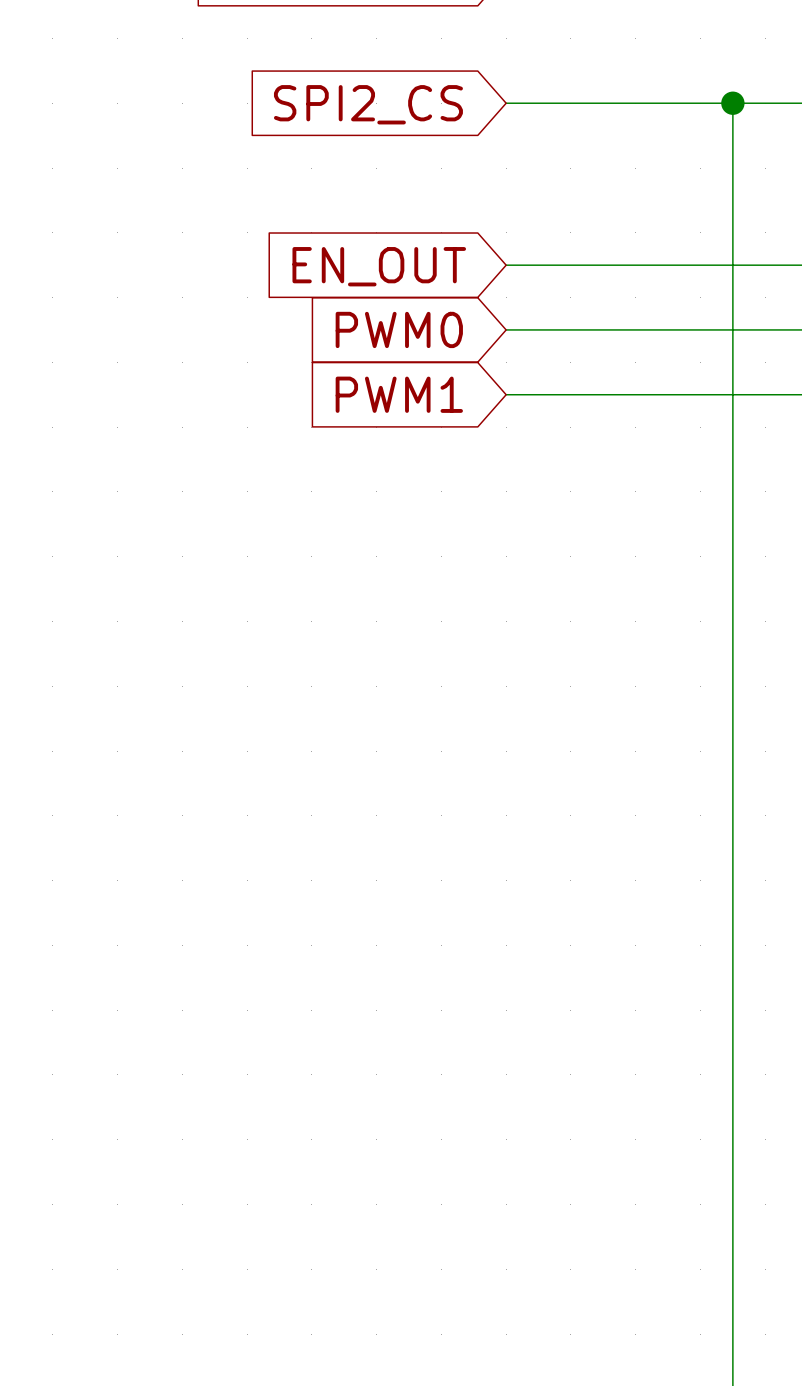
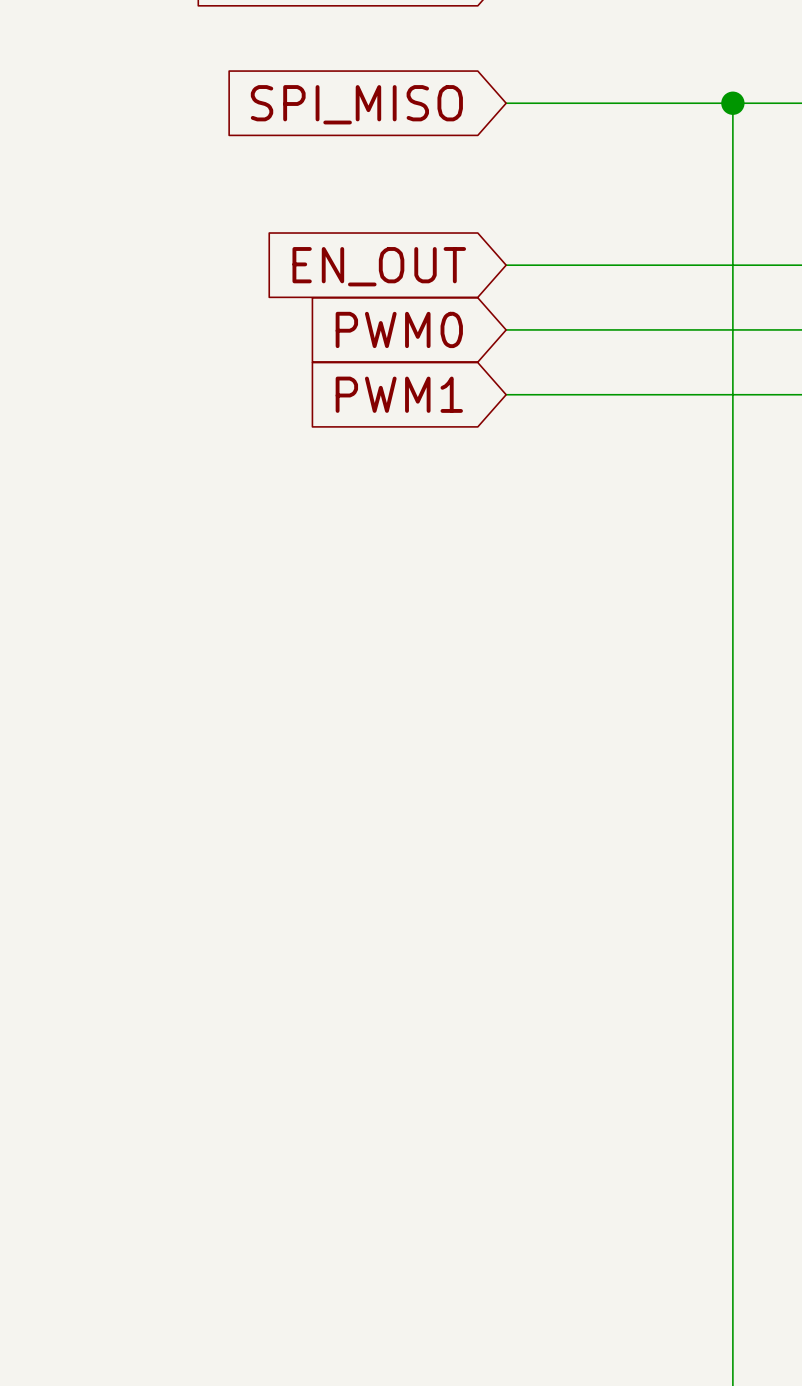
global label: SPI2_CS (368, 104) -> SPI_MISO (356, 104)

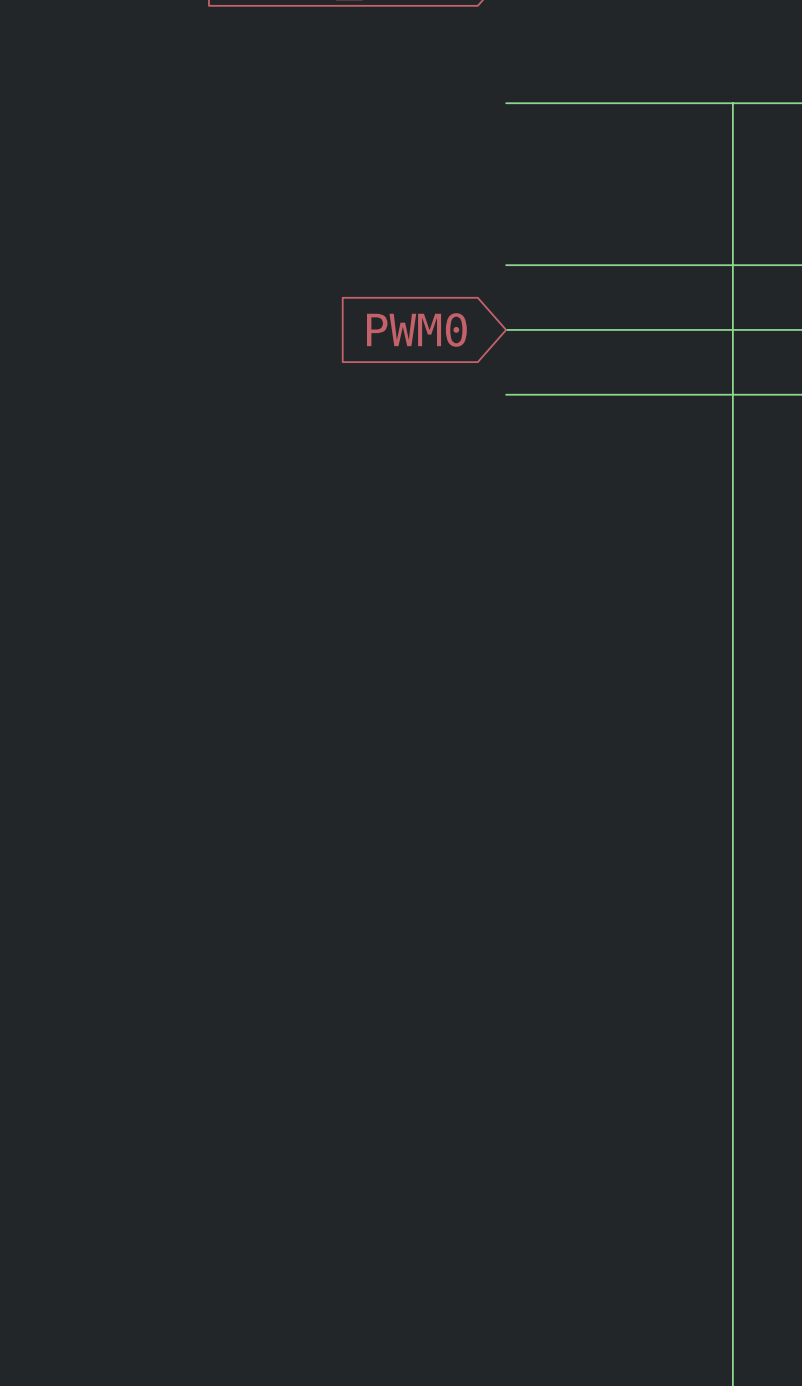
junction: (732, 103) -> none
global label: SPI_MISO (356, 104) -> none
global label: EN_OUT (379, 266) -> none
global label: PWM1 (399, 394) -> none

